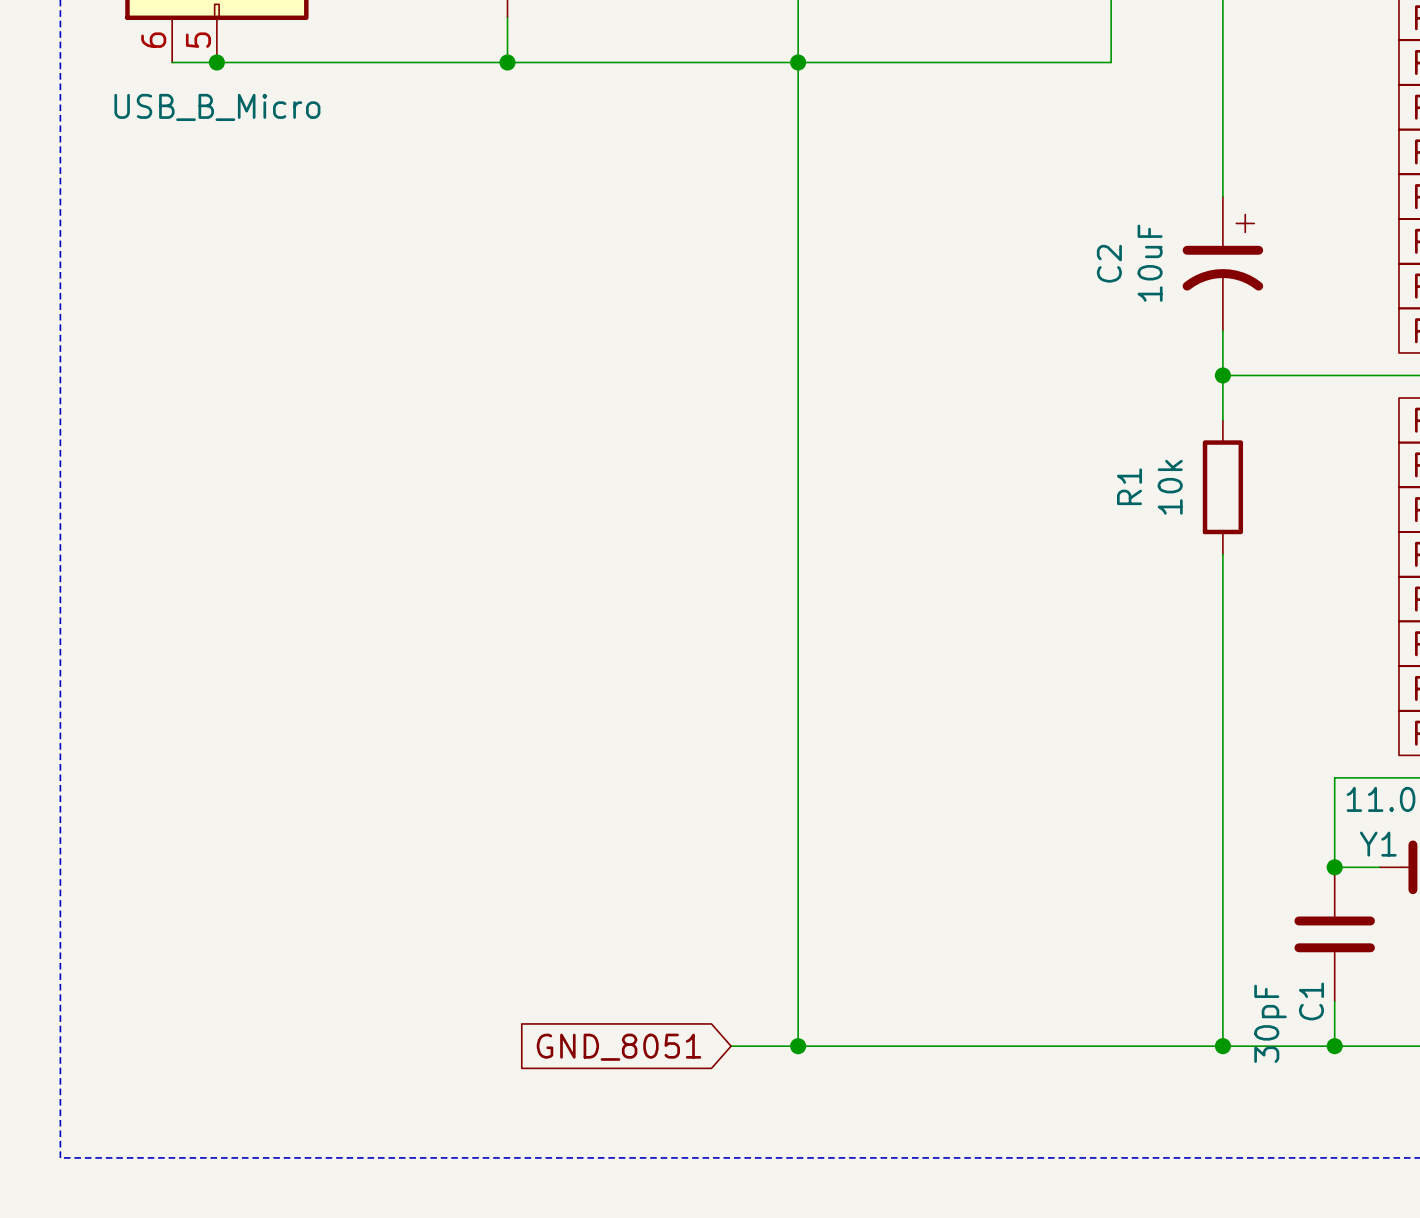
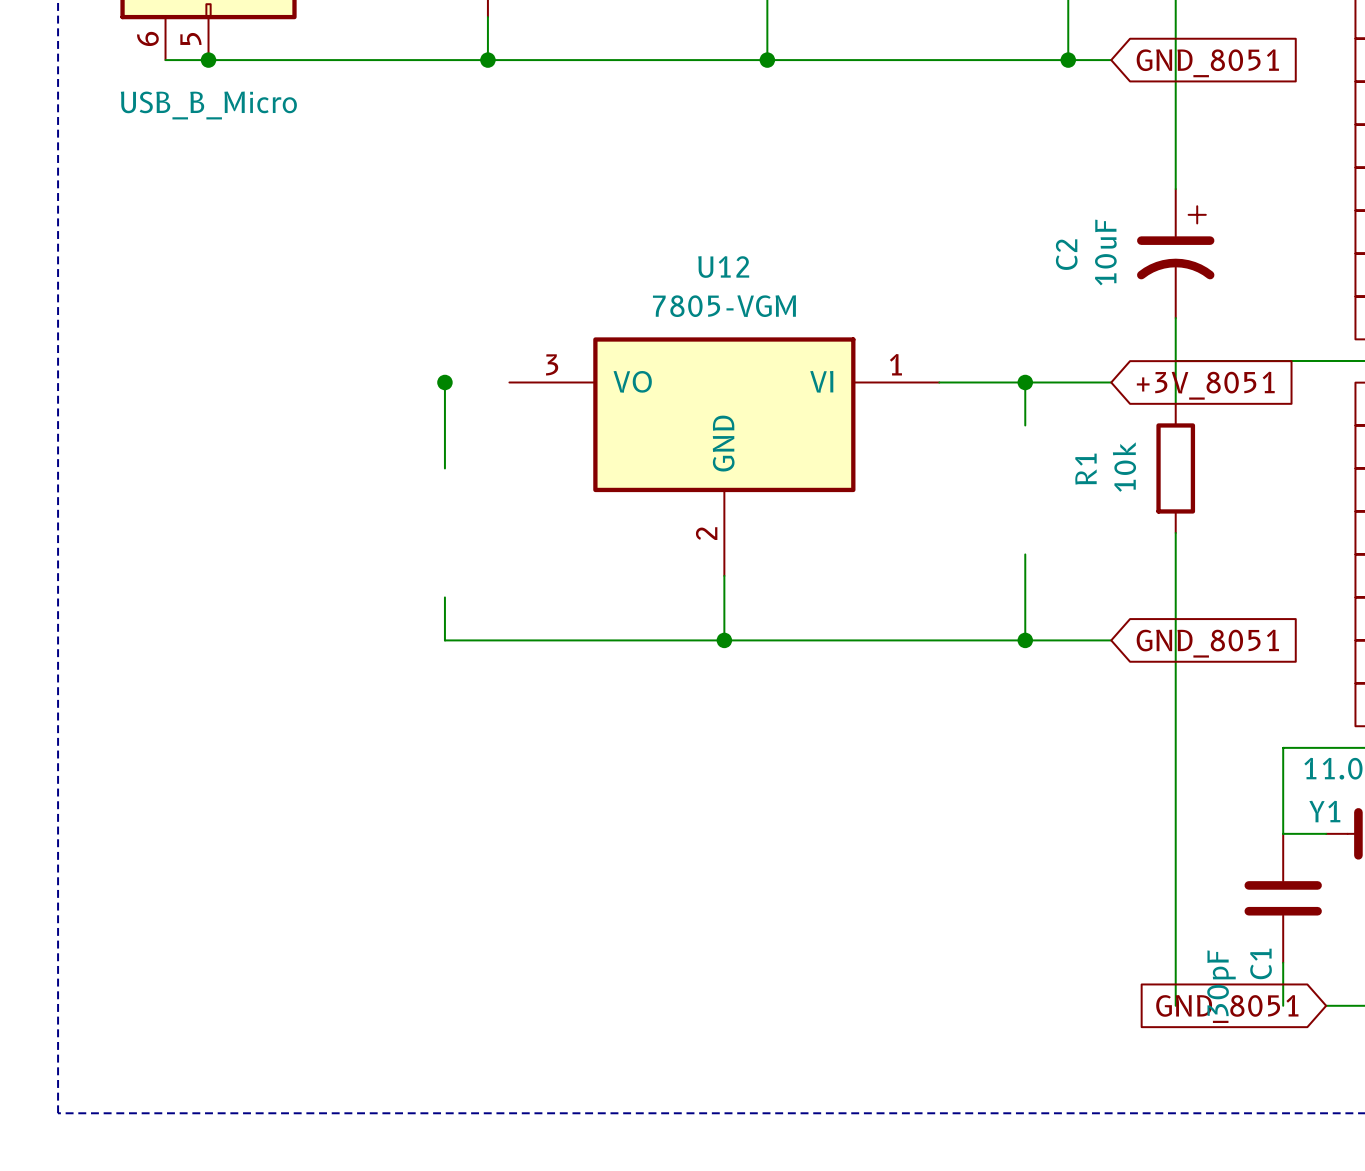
wire: (798, 62) (798, 1046) -> none
wire: none -> (1068, 60) (1111, 60)
junction: none -> (1068, 60)
global label: none -> GND_8051 (1207, 63)
junction: (1222, 375) -> none
wire: none -> (444, 382) (444, 468)
junction: none -> (444, 382)
wire: none -> (939, 382) (1111, 382)
wire: none -> (1025, 382) (1025, 425)
junction: none -> (1025, 382)
global label: none -> +3V_8051 (1205, 385)
U12: none -> 7805-VGM (724, 456)
wire: none -> (1025, 554) (1025, 640)
wire: none -> (724, 575) (724, 640)
wire: none -> (444, 597) (444, 640) (1111, 640)
junction: none -> (724, 640)
junction: none -> (1025, 640)
global label: none -> GND_8051 (1207, 643)
junction: (1334, 867) -> none
wire: (731, 1046) (1379, 1046) -> none
junction: (798, 1046) -> none
junction: (1222, 1046) -> none
junction: (1334, 1046) -> none
global label: GND_8051 (618, 1047) -> none
global label: none -> GND_8051 (1227, 1009)

